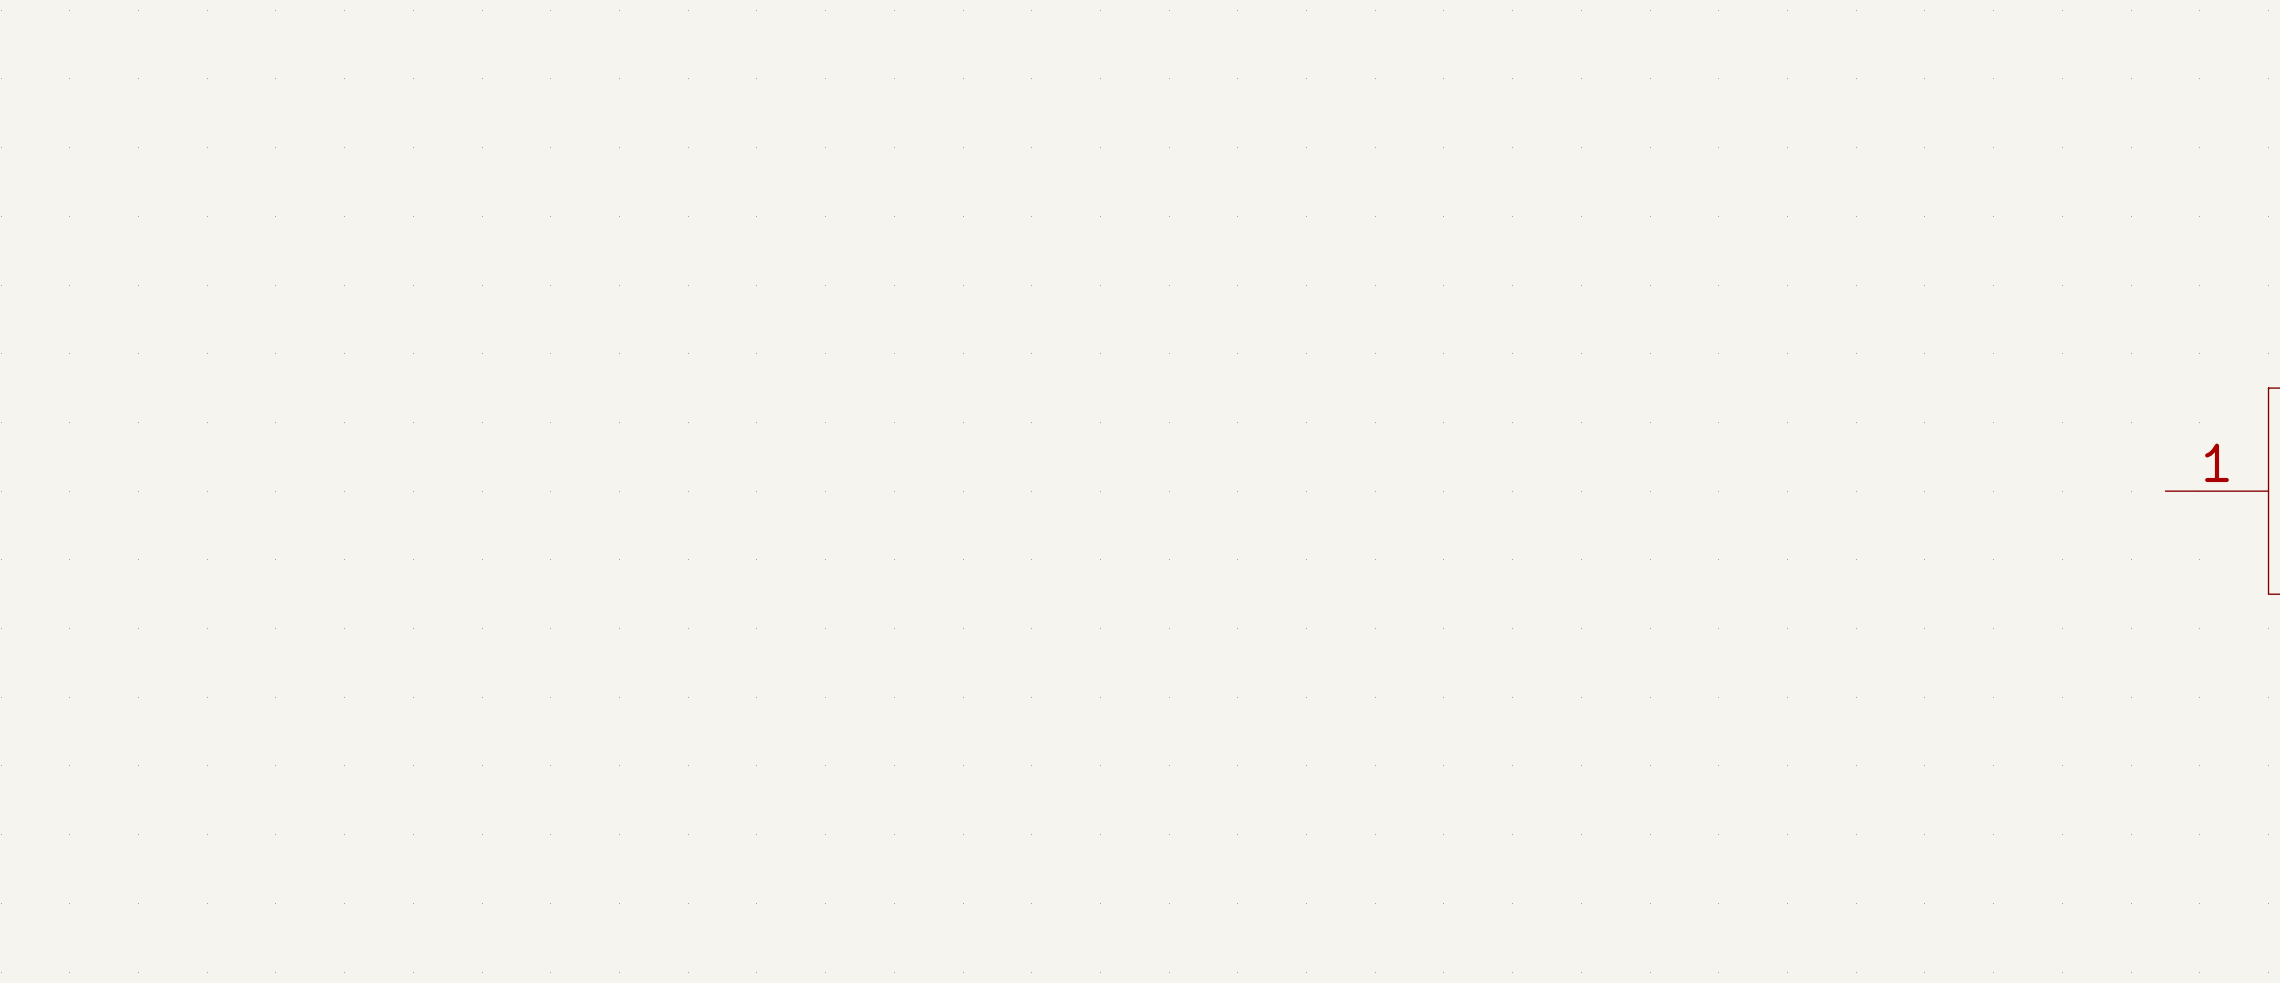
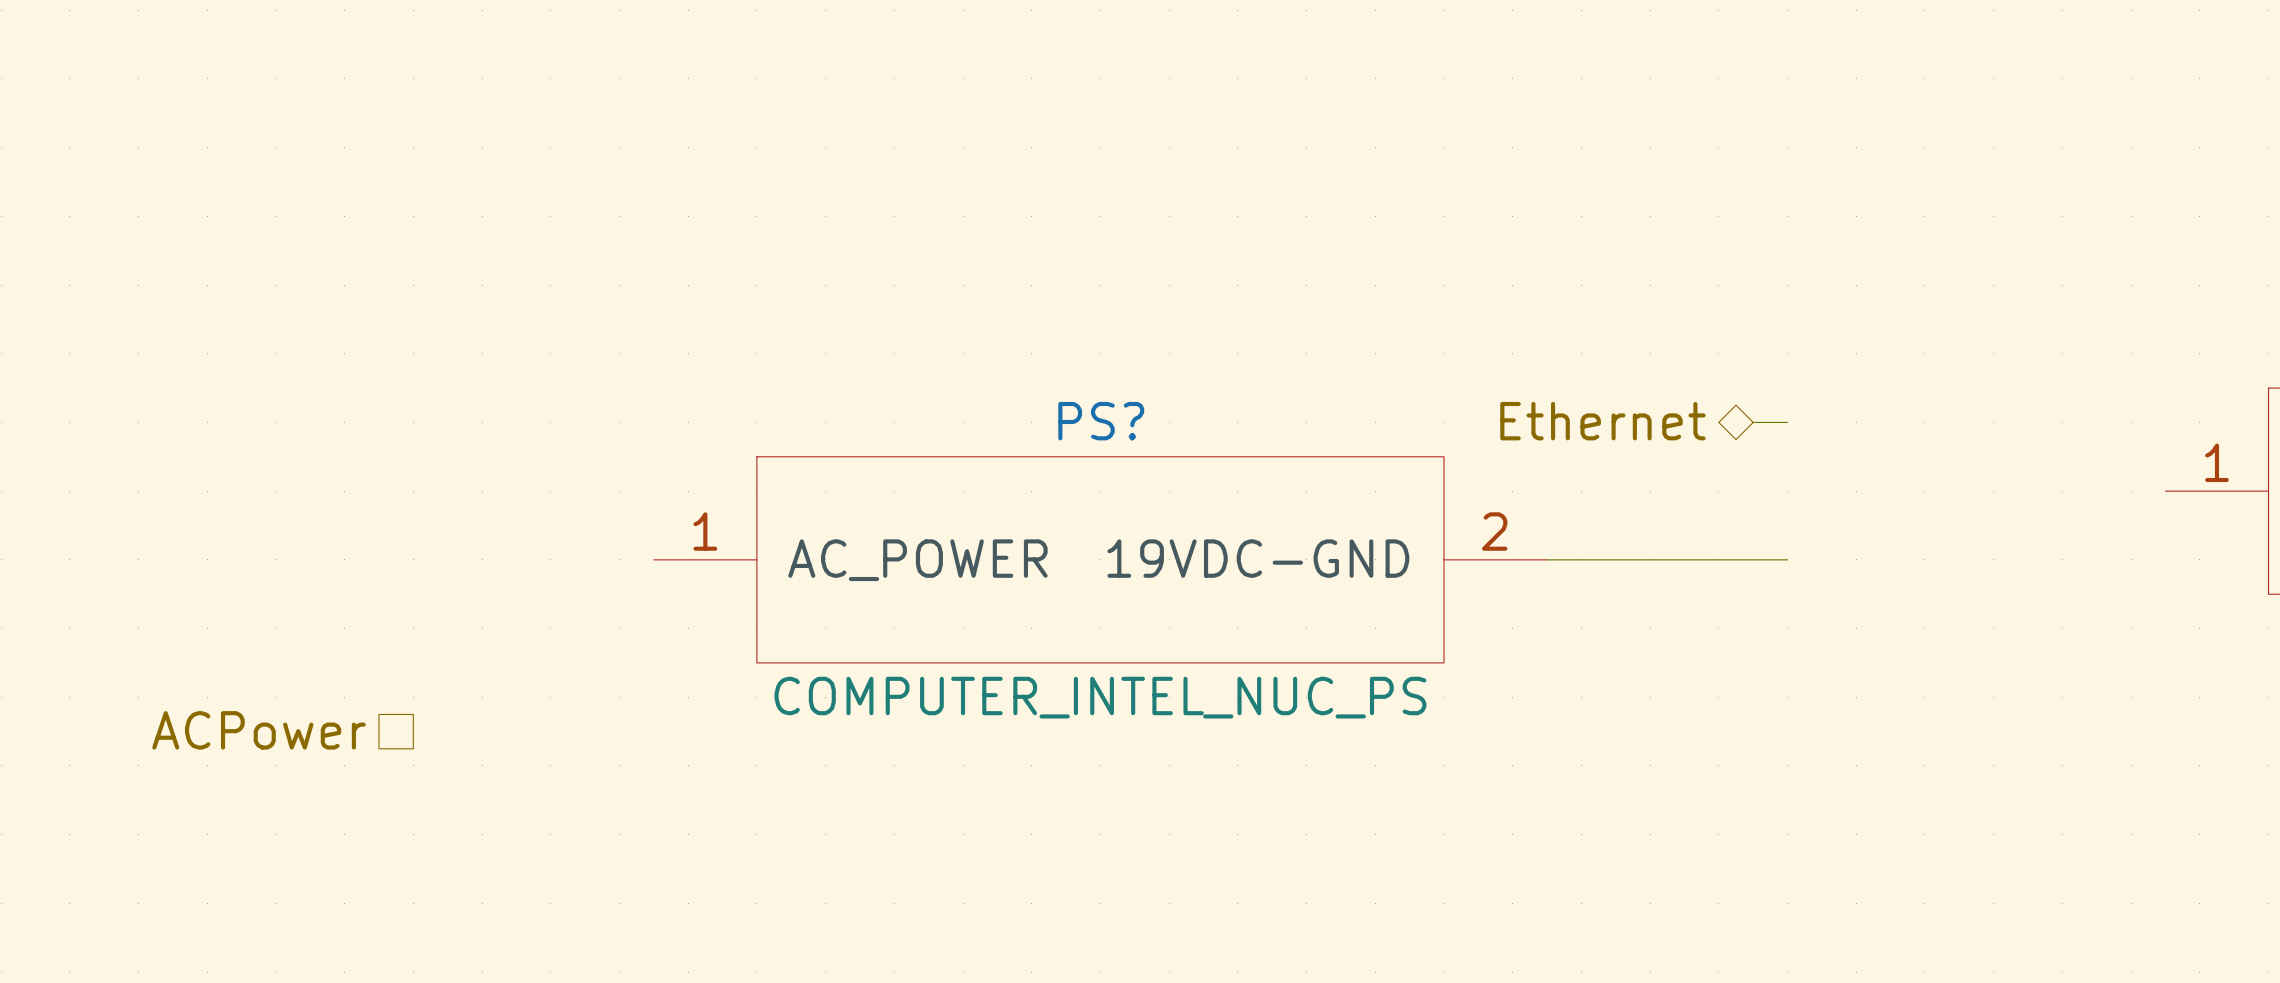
hierarchical label: none -> Ethernet (1602, 421)
wire: none -> (1753, 422) (1787, 422)
PS?: none -> COMPUTER_INTEL_NUC_PS (1100, 559)
wire: none -> (1547, 559) (1787, 559)
hierarchical label: none -> ACPower (259, 730)

